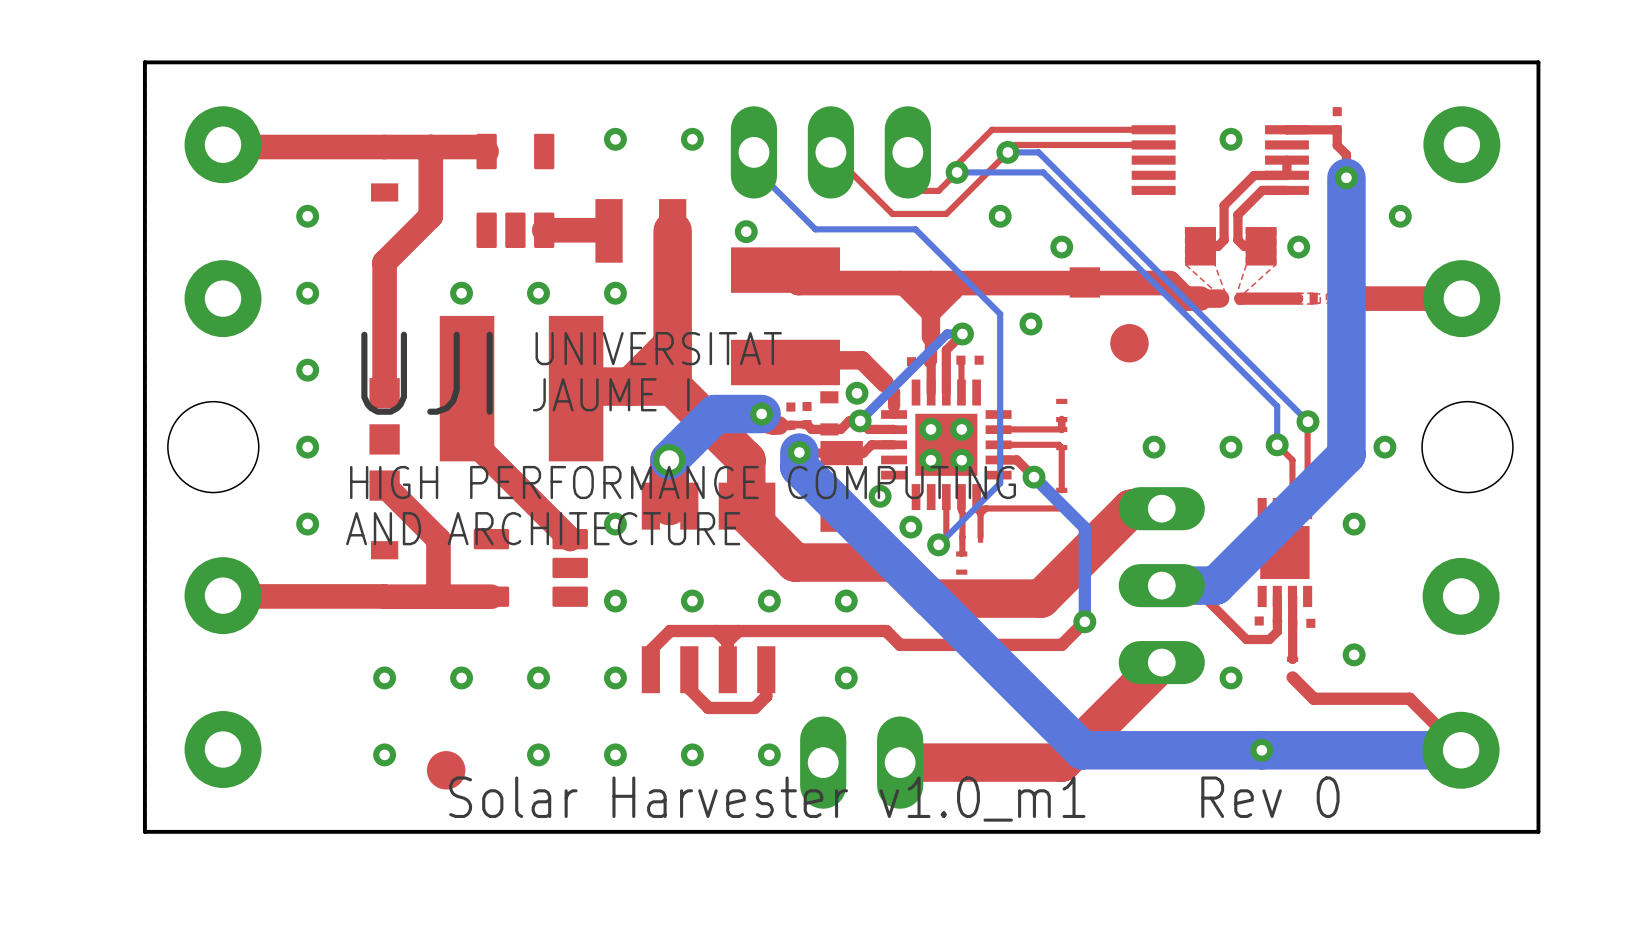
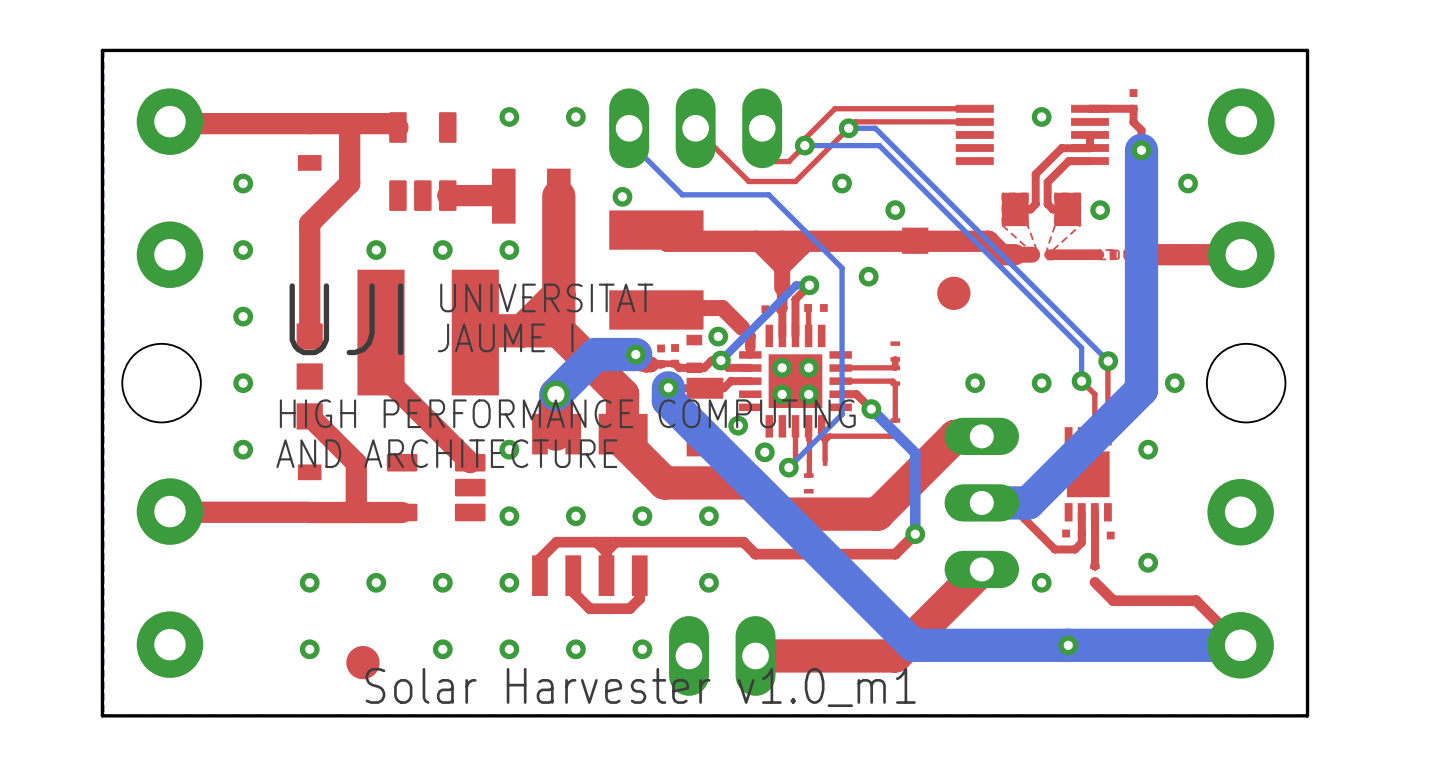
text: Rev 0 (1270, 797) -> none

